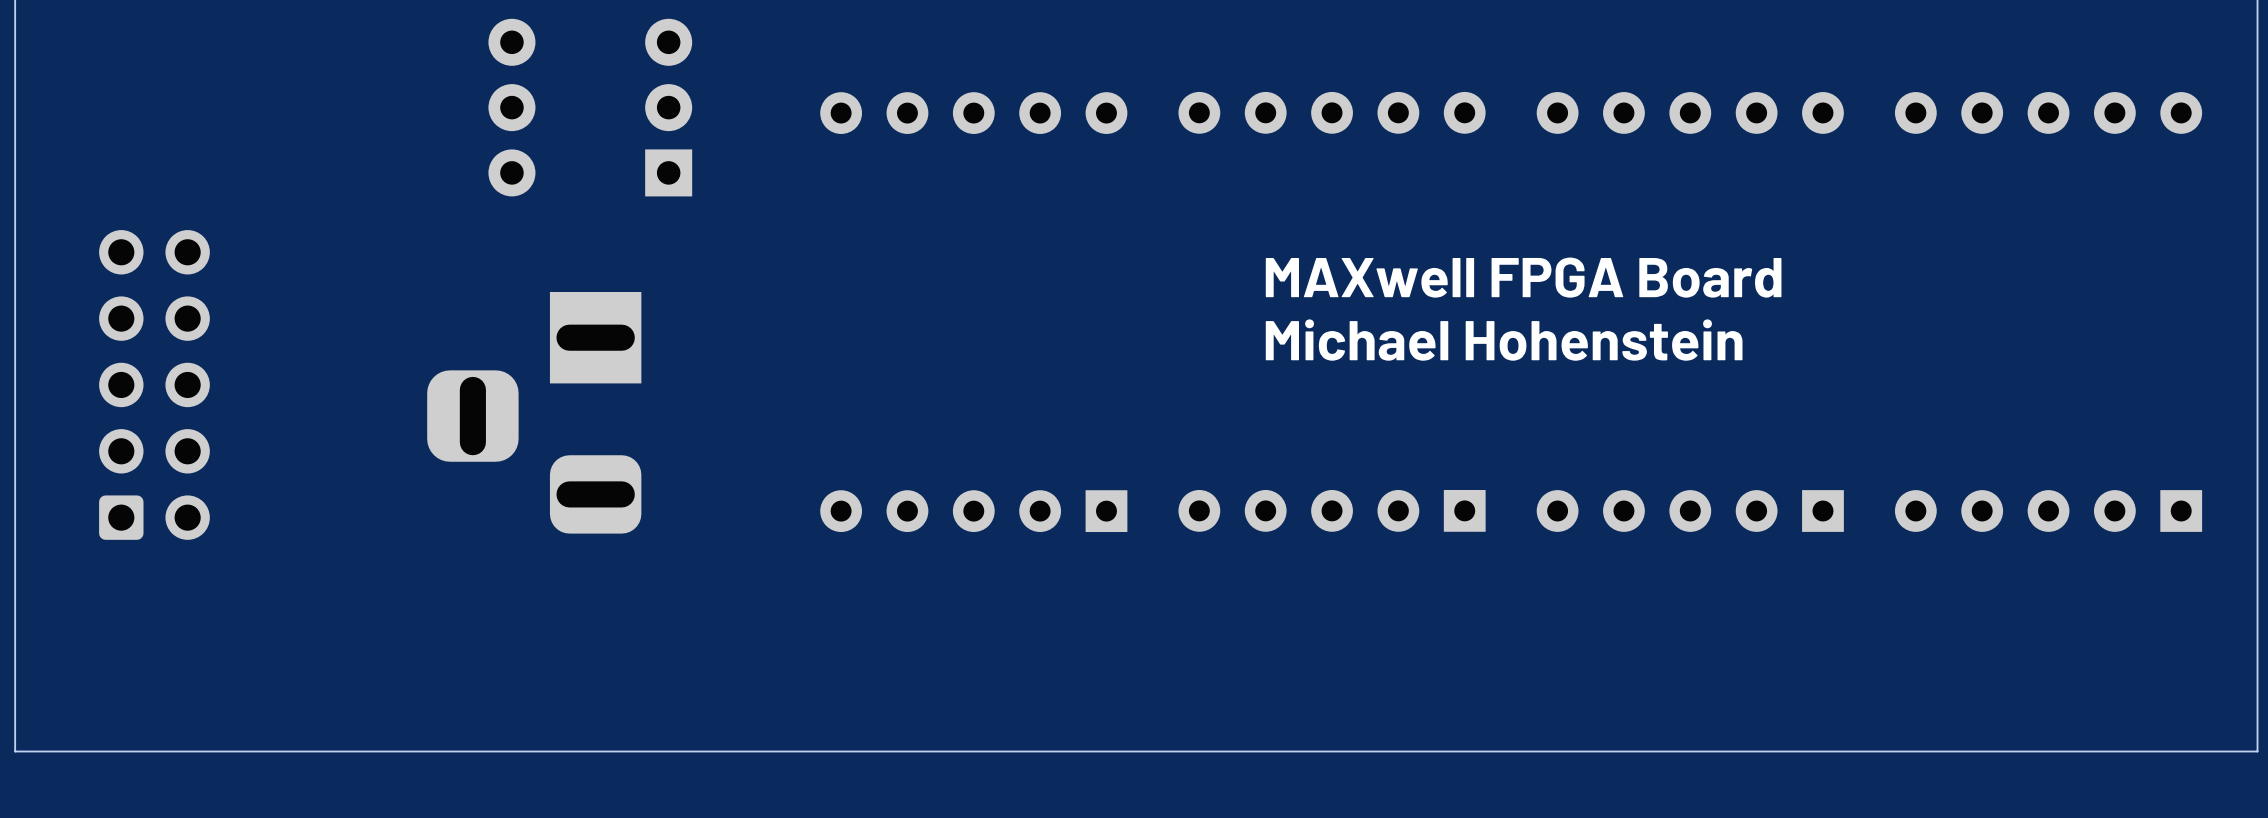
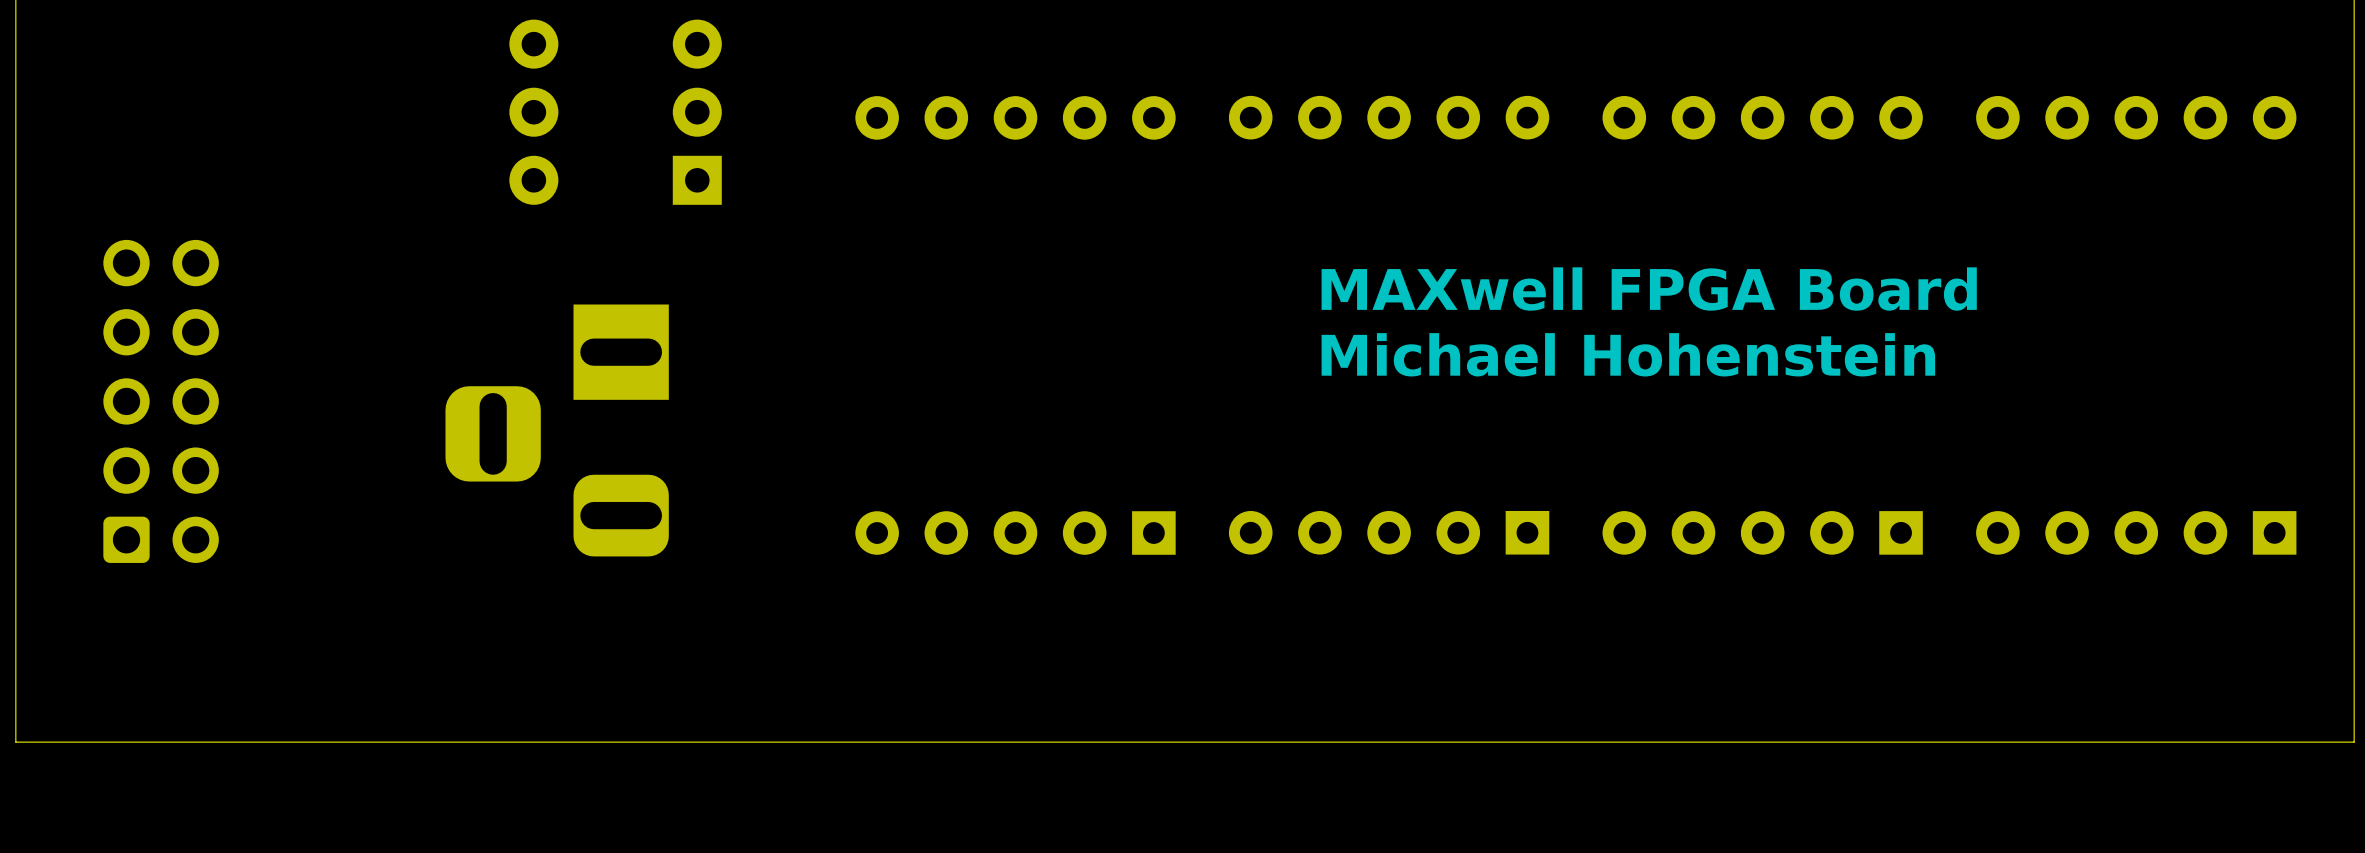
board edge: (2257, 711) (2257, 751) (15, 751) (15, 711) -> (2354, 742) (15, 742)

